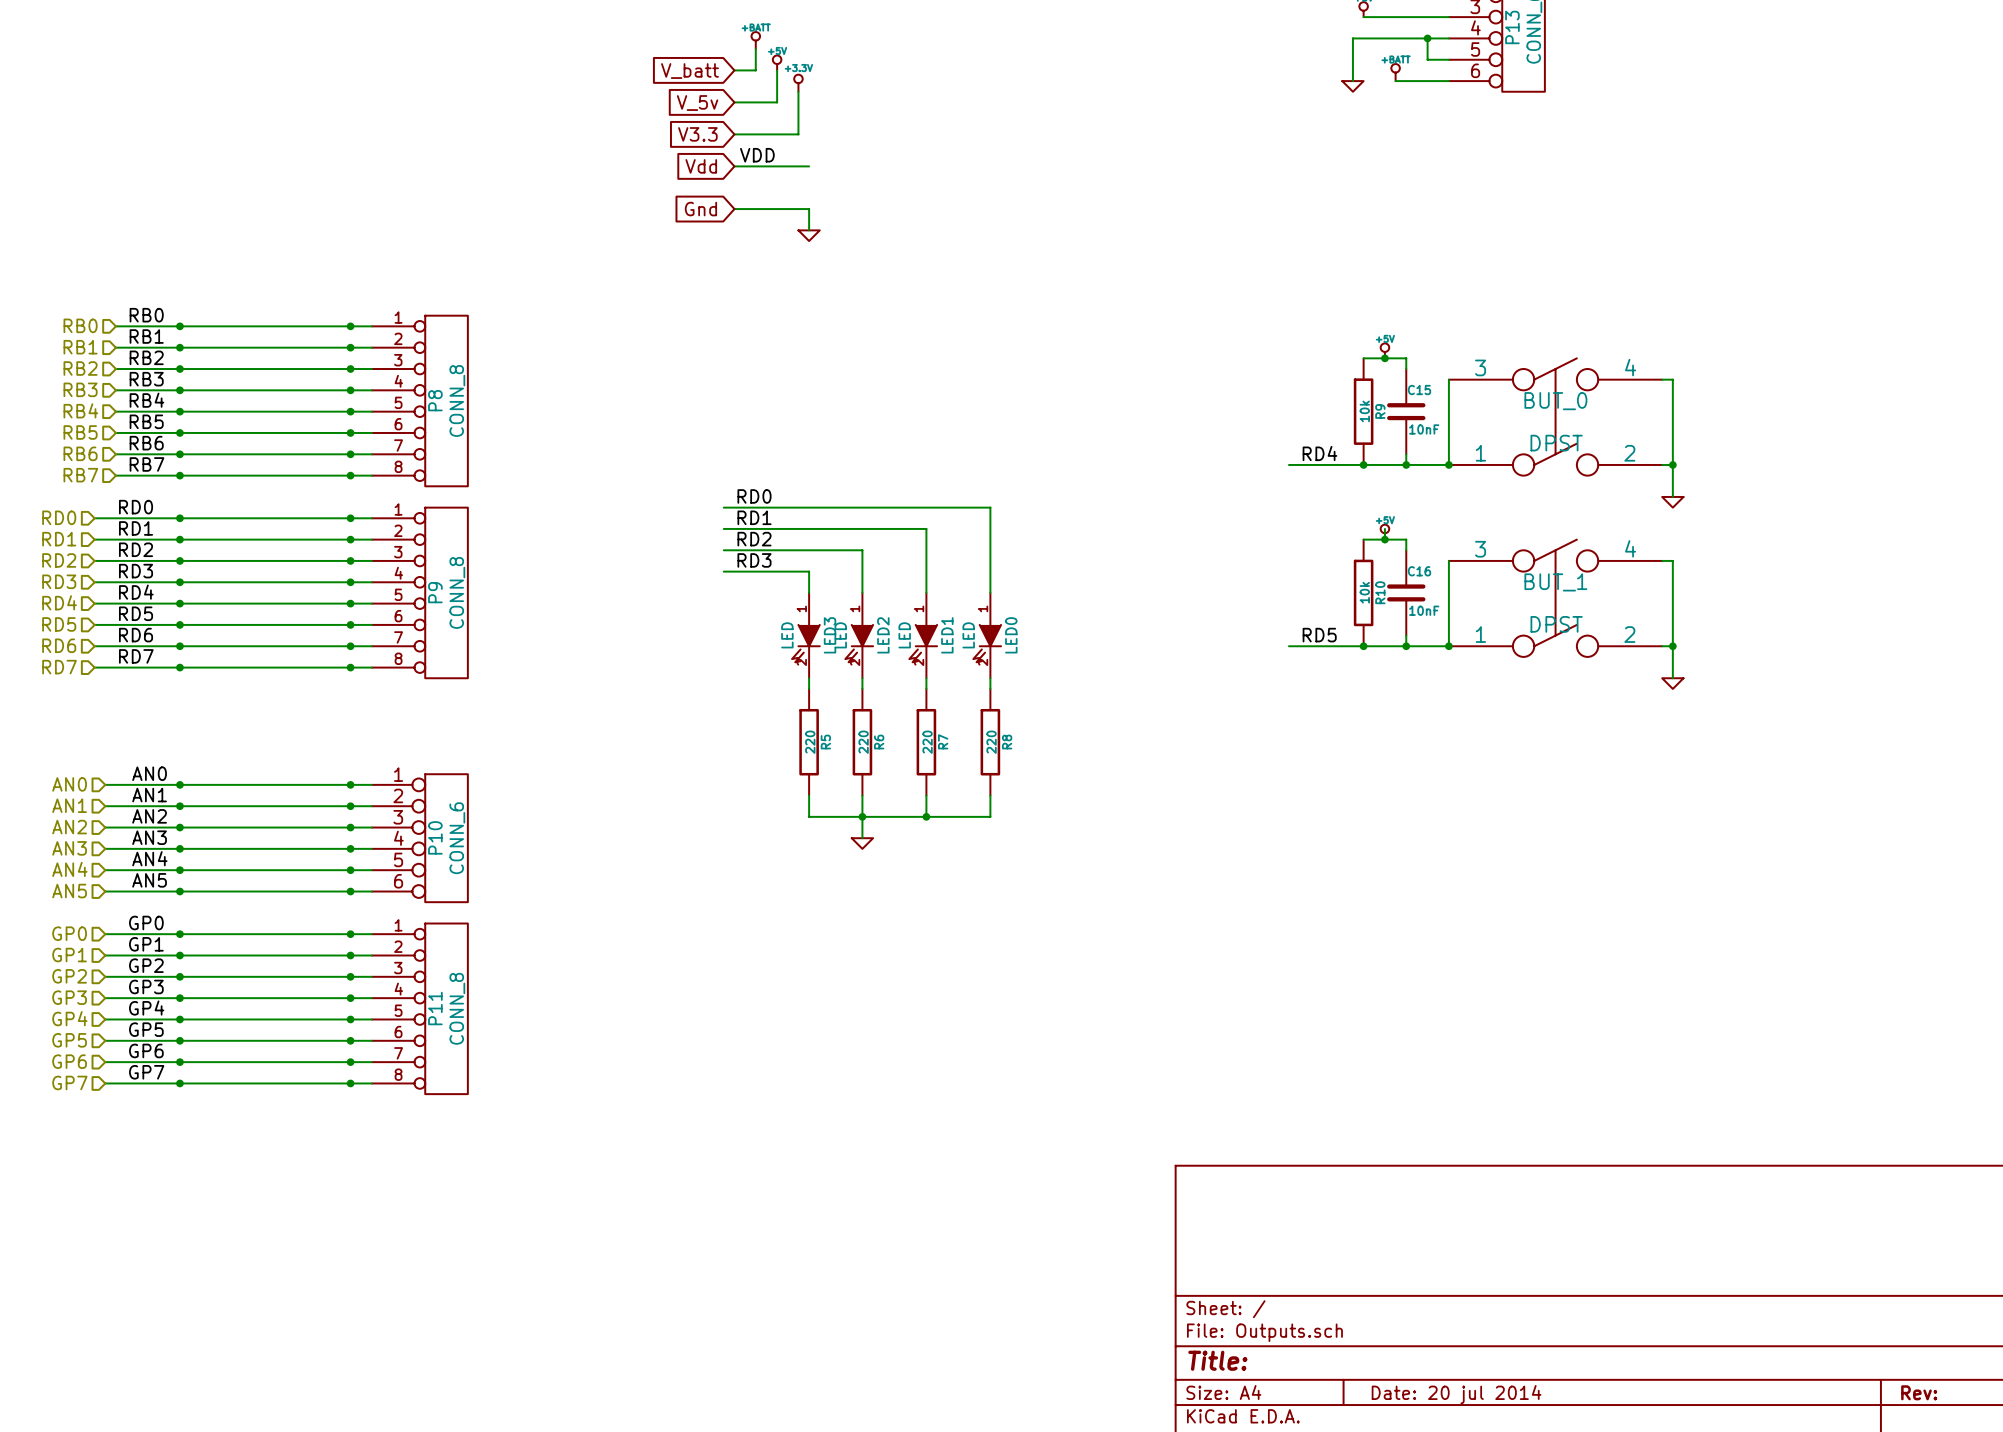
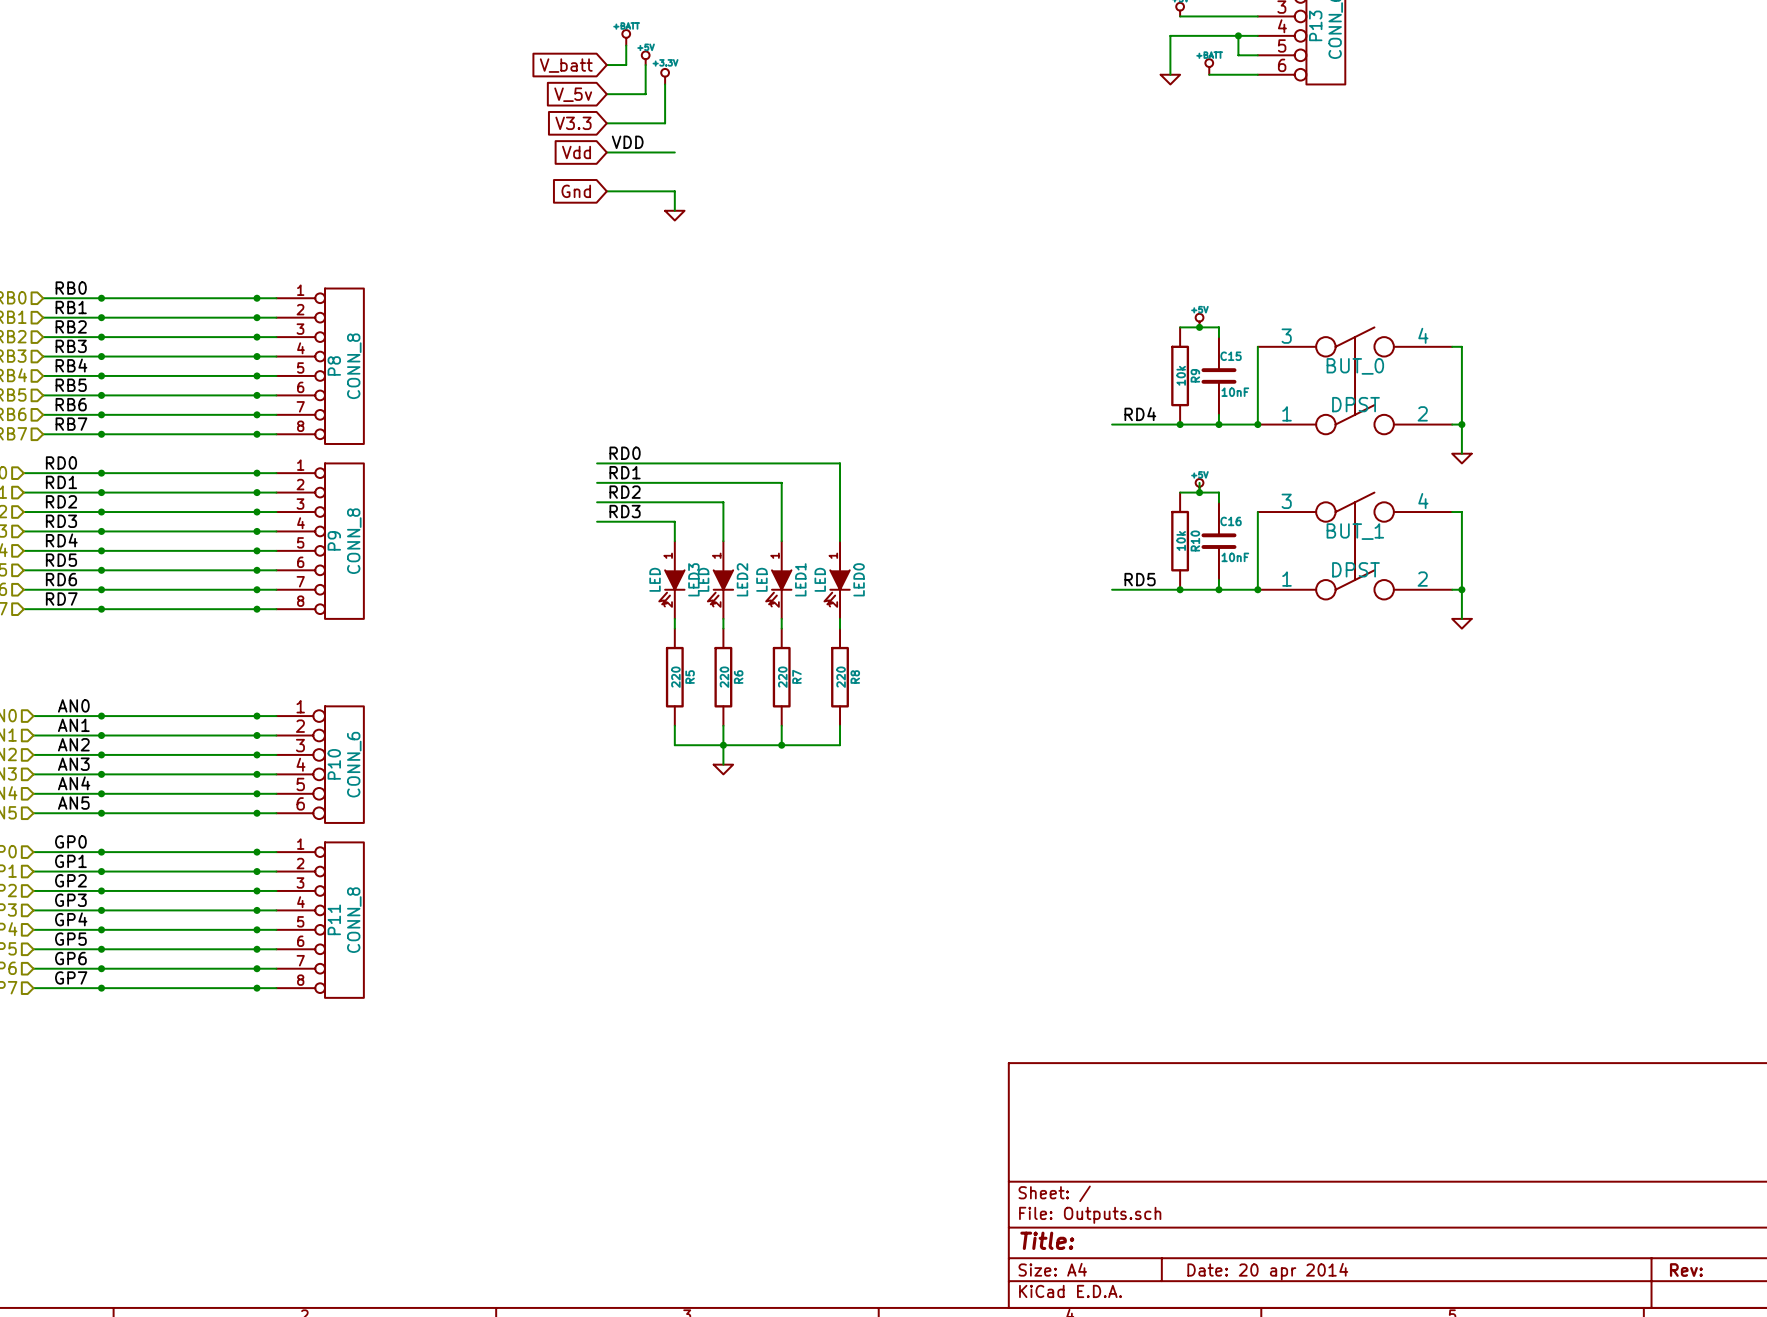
title block: Date: 20 jul 2014 (1456, 1394) -> Date: 20 apr 2014 (1267, 1271)

